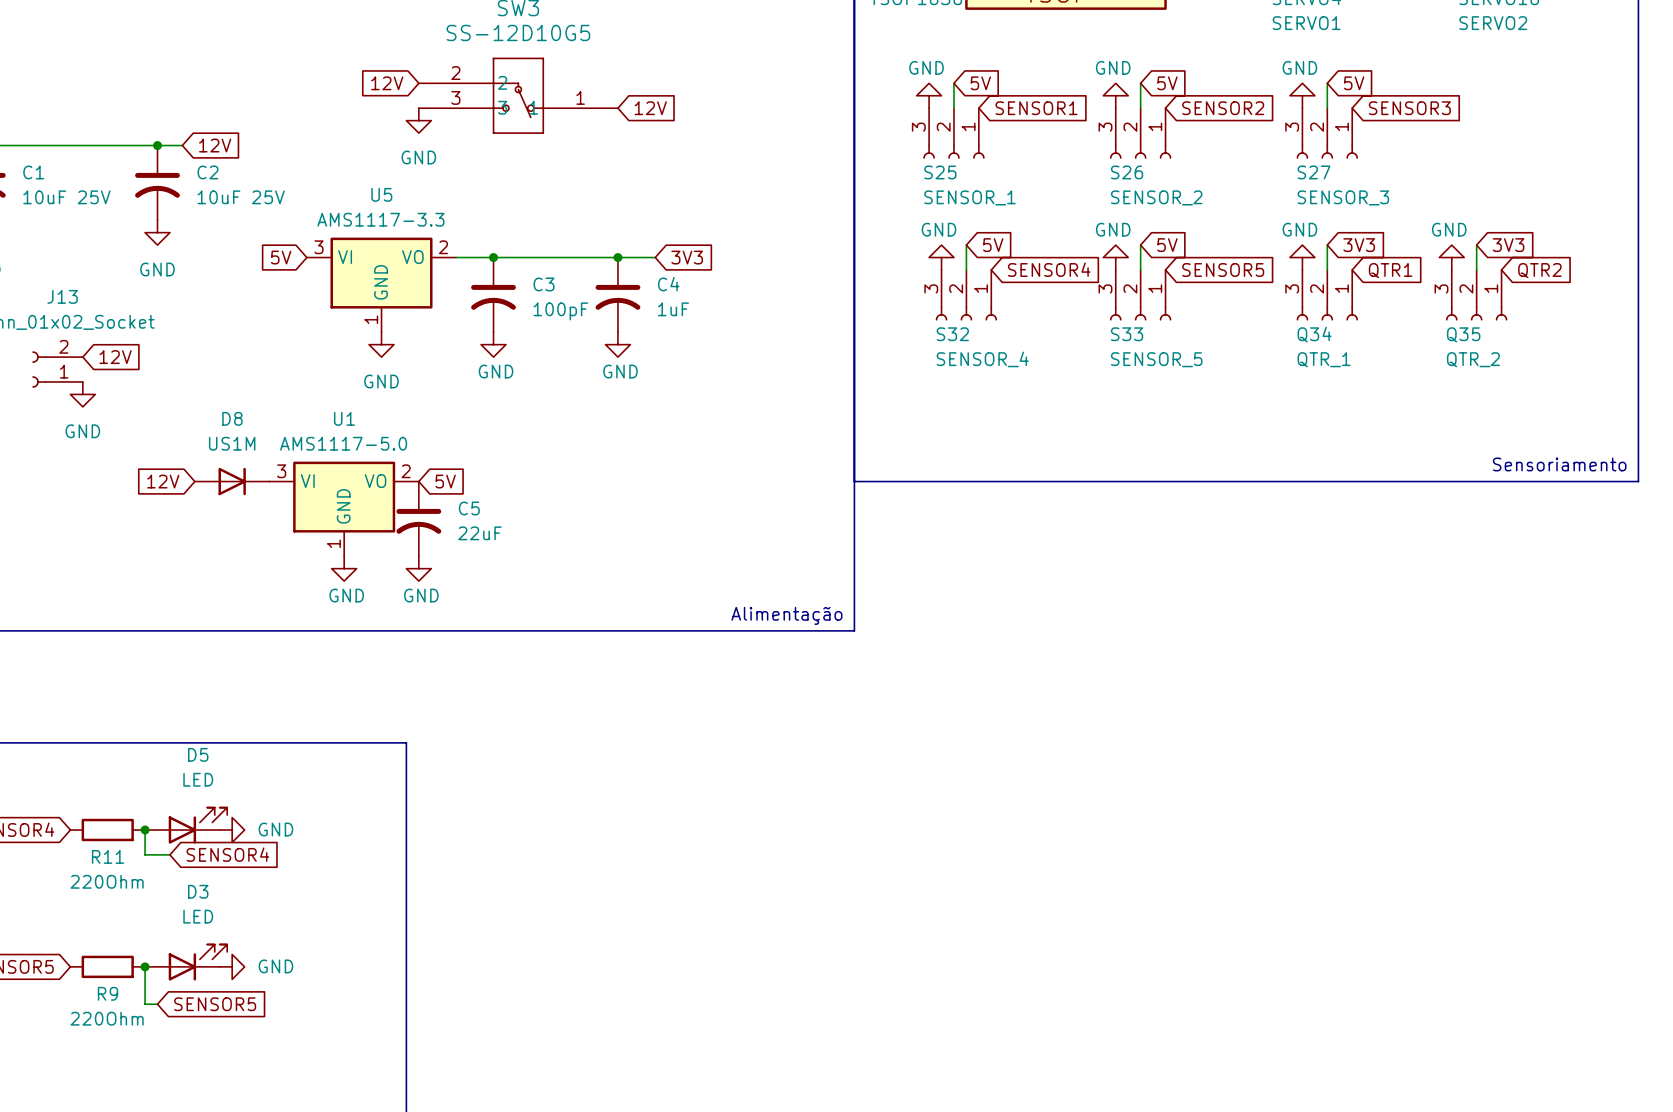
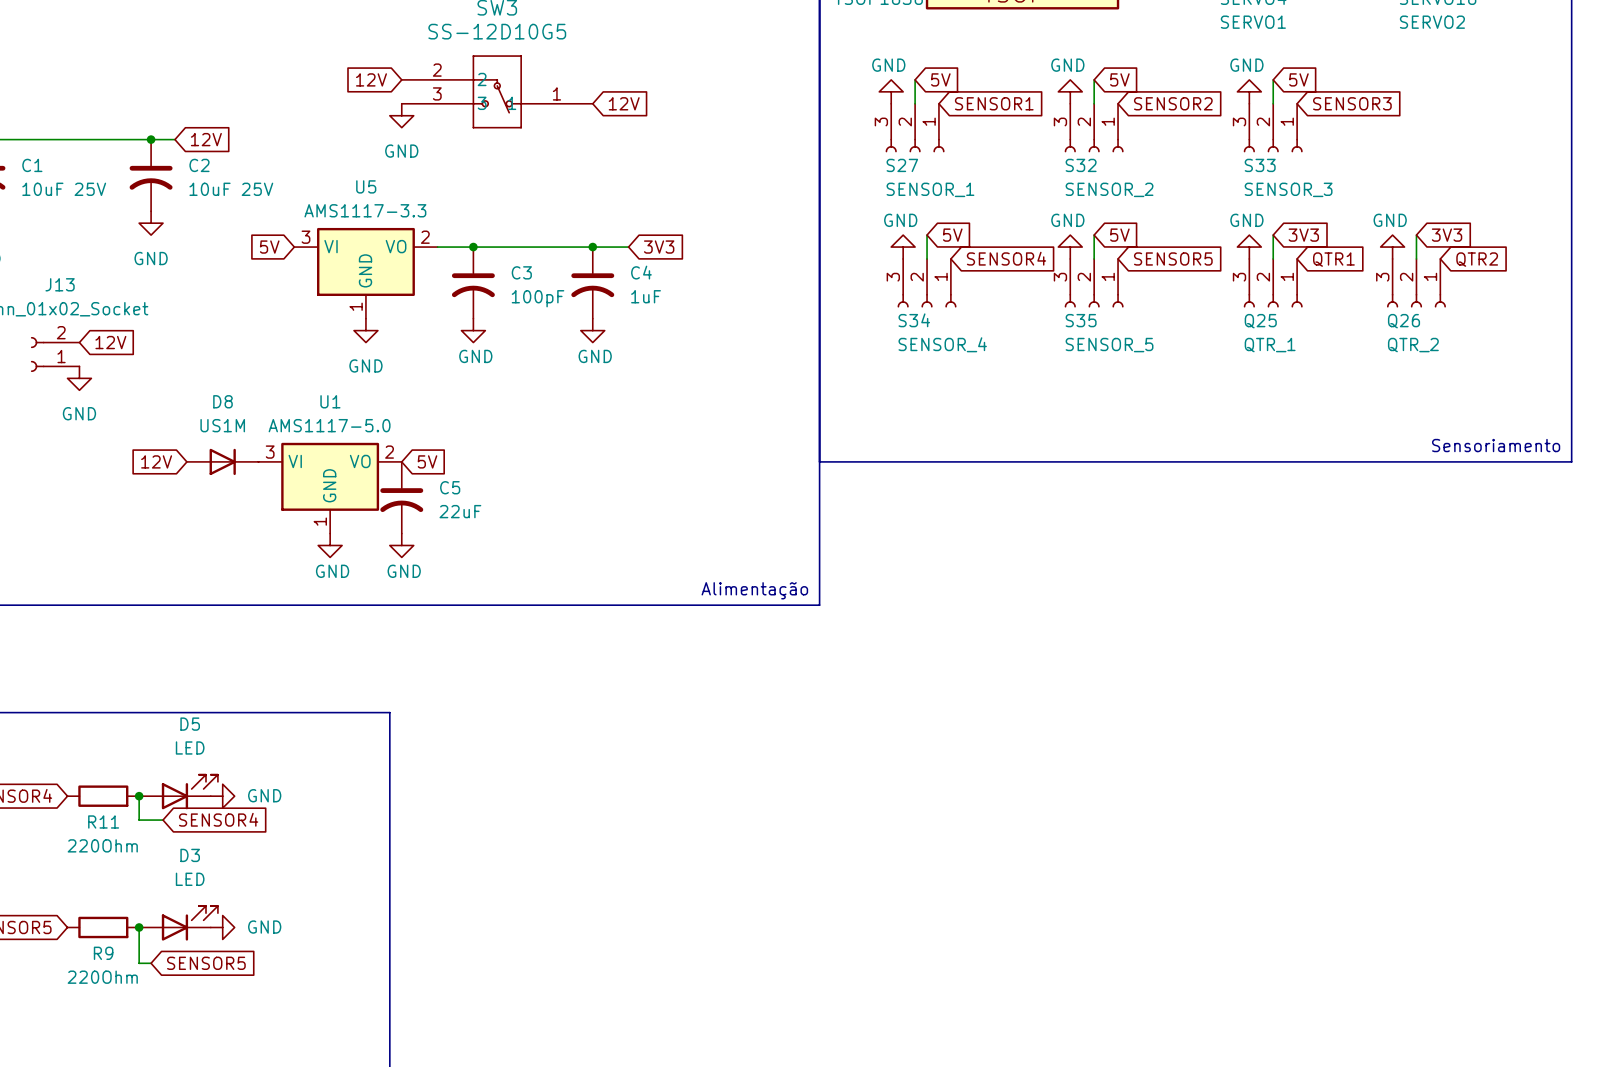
S25 name: S25 (940, 172) -> S27 (902, 165)
S26 name: S26 (1127, 172) -> S32 (1081, 165)
S27 name: S27 (1314, 172) -> S33 (1260, 165)
S32 name: S32 (952, 334) -> S34 (914, 320)
S33 name: S33 (1127, 334) -> S35 (1081, 320)
Q34 name: Q34 (1314, 334) -> Q25 (1260, 321)
Q35 name: Q35 (1463, 334) -> Q26 (1404, 321)

